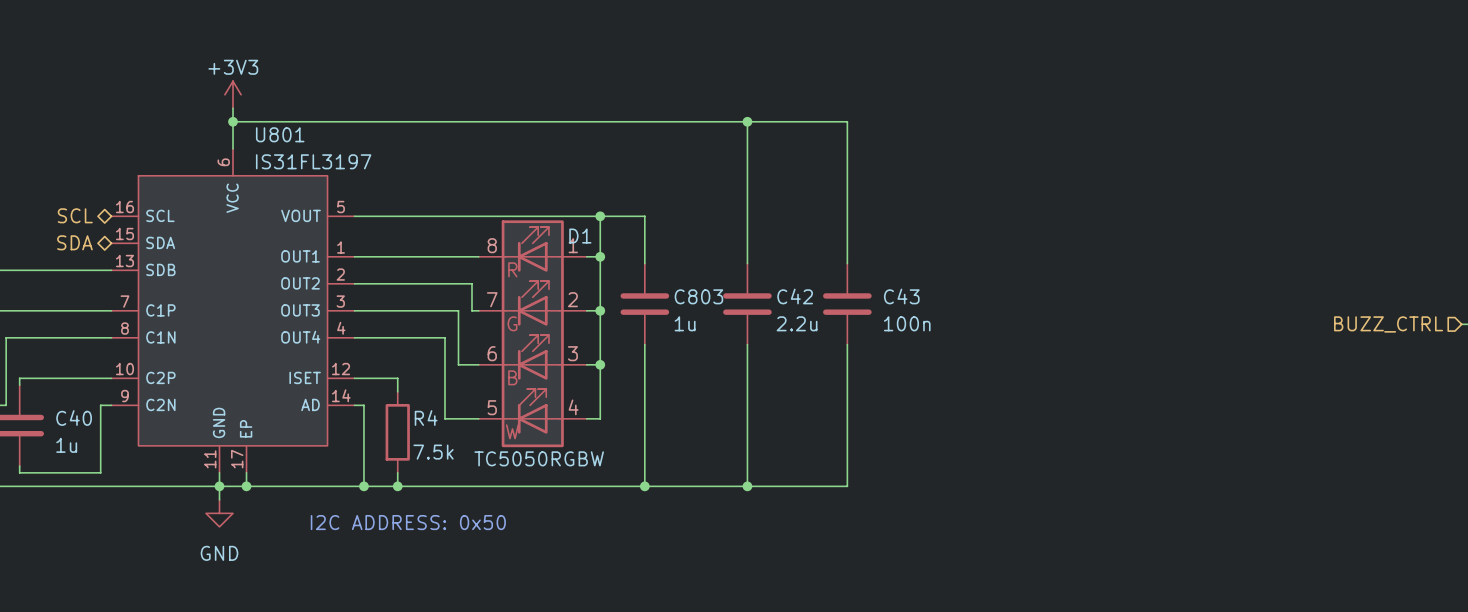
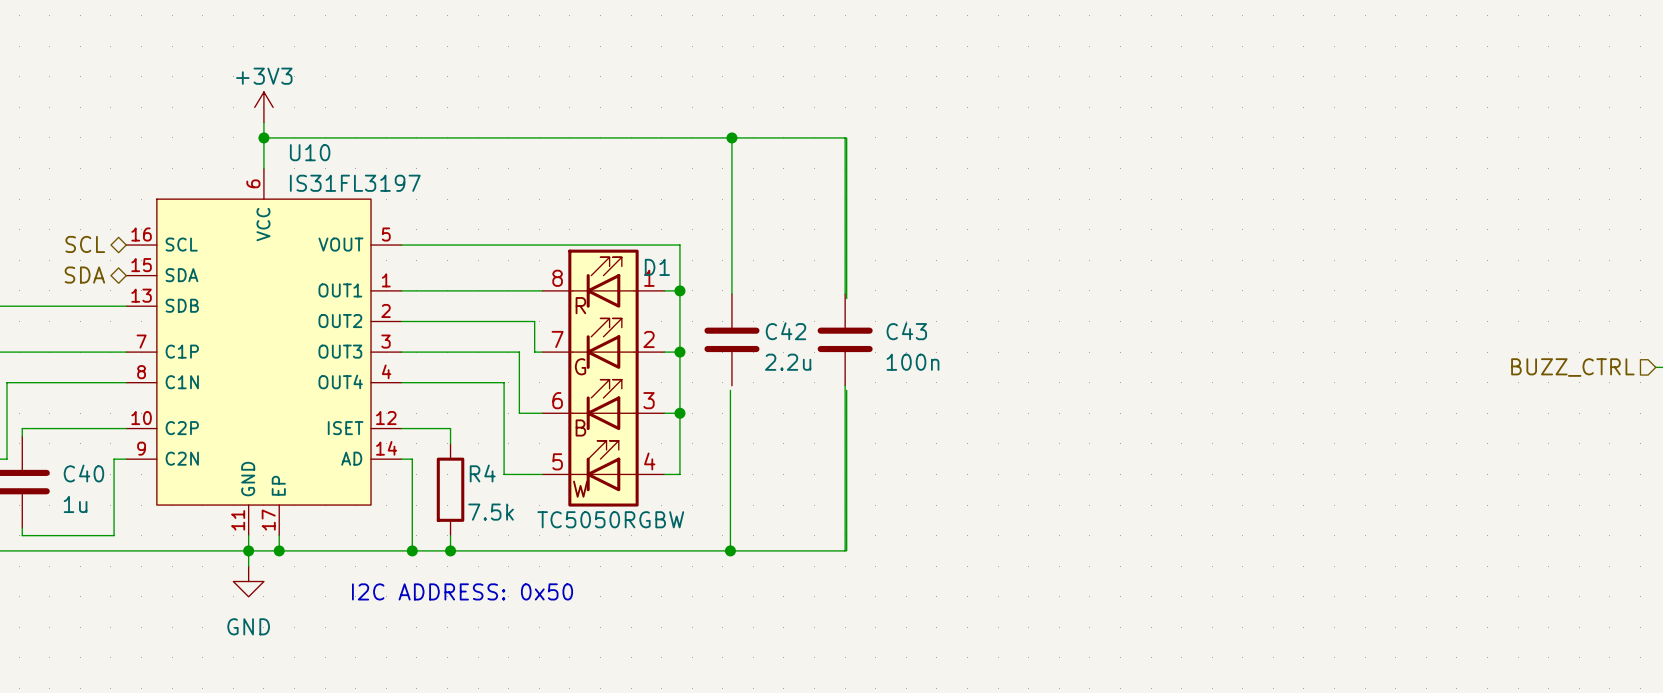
wire: none -> (731, 137) (731, 293)
junction: none -> (731, 137)
wire: (746, 121) (847, 121) (847, 263) -> (845, 137) (845, 293)
junction: (747, 121) -> none
U801 name: U801 (280, 134) -> U10 (310, 152)
wire: (600, 216) (644, 216) (644, 263) -> none
junction: (600, 216) -> none
C803: 1u (644, 304) -> none
C42 position: (747, 304) -> (731, 339)
C43 position: (847, 304) -> (845, 339)
wire: (847, 344) (847, 486) (746, 486) -> (845, 385) (845, 550)
junction: (747, 486) -> none

